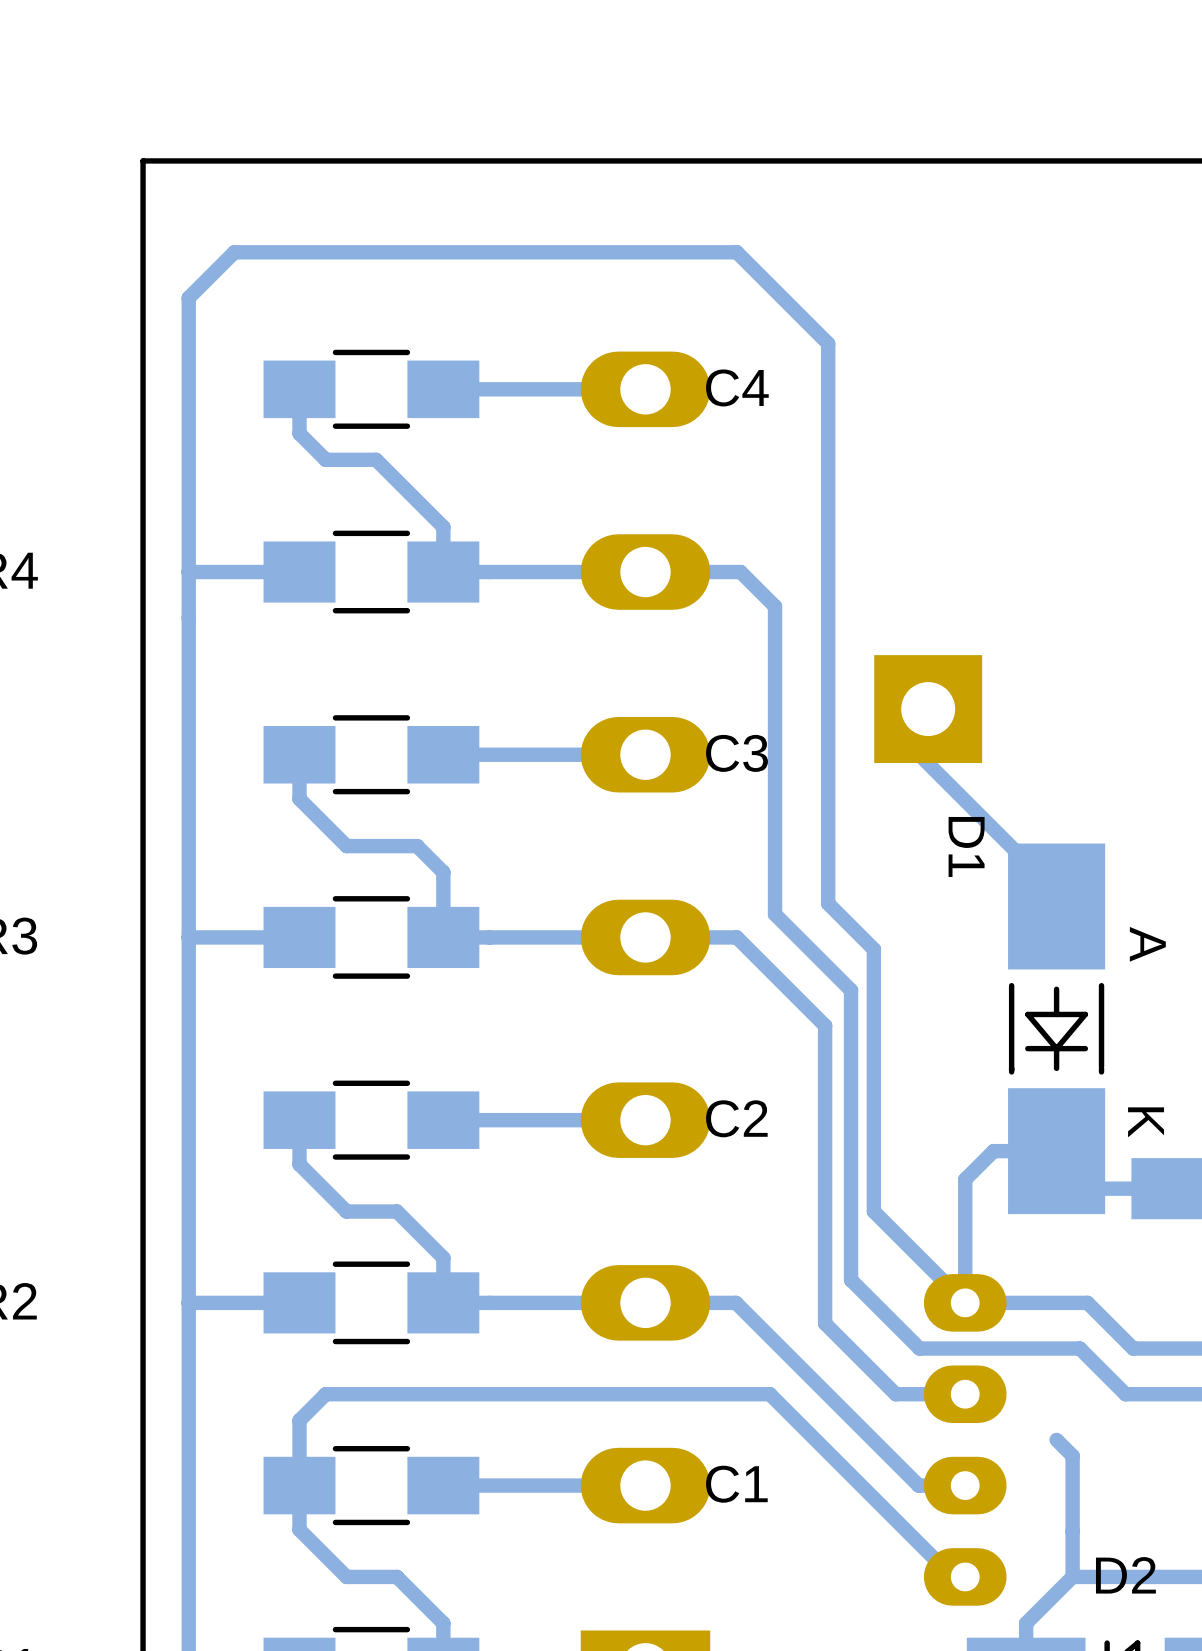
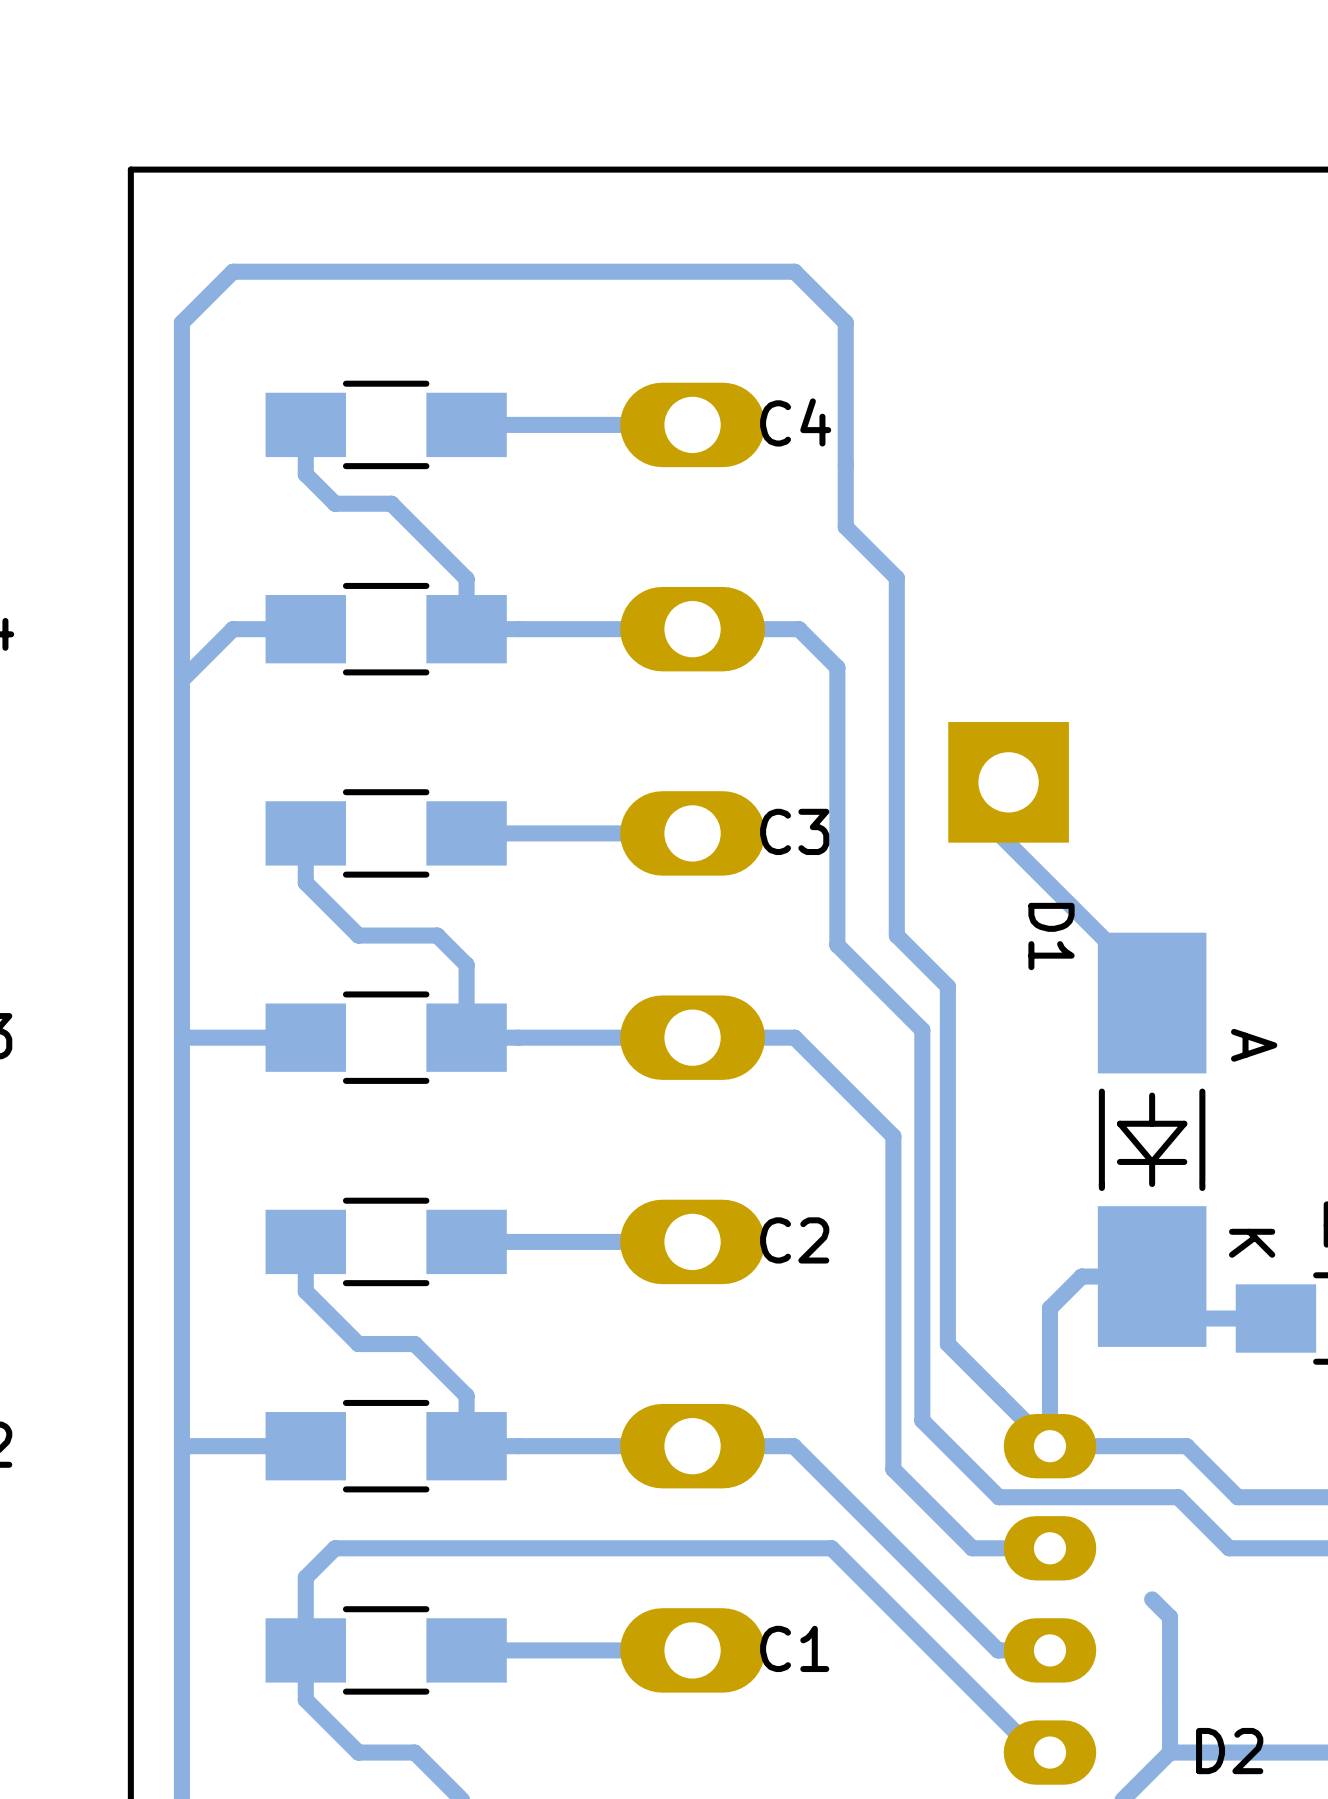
track: (782, 297) (828, 343) (828, 526) -> (845, 322) (845, 527) (896, 578)
track: (234, 572) (188, 572) -> (232, 629) (181, 680)
track: (828, 846) (828, 903) (873, 949) -> (896, 935) (947, 986) (947, 1050)
track: (775, 854) (775, 914) (851, 990) -> (837, 945) (922, 1030) (922, 1096)

